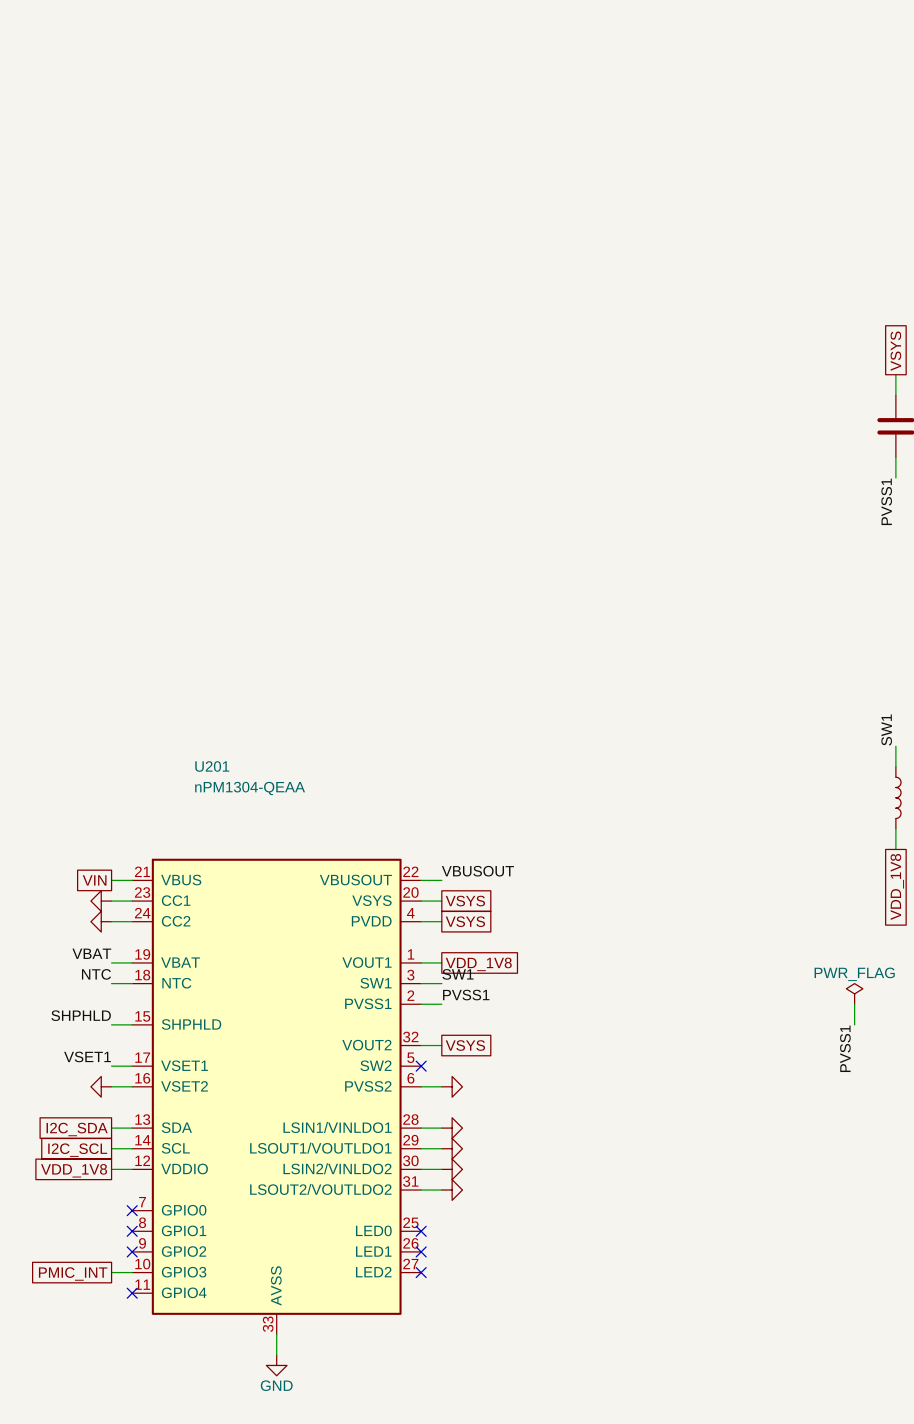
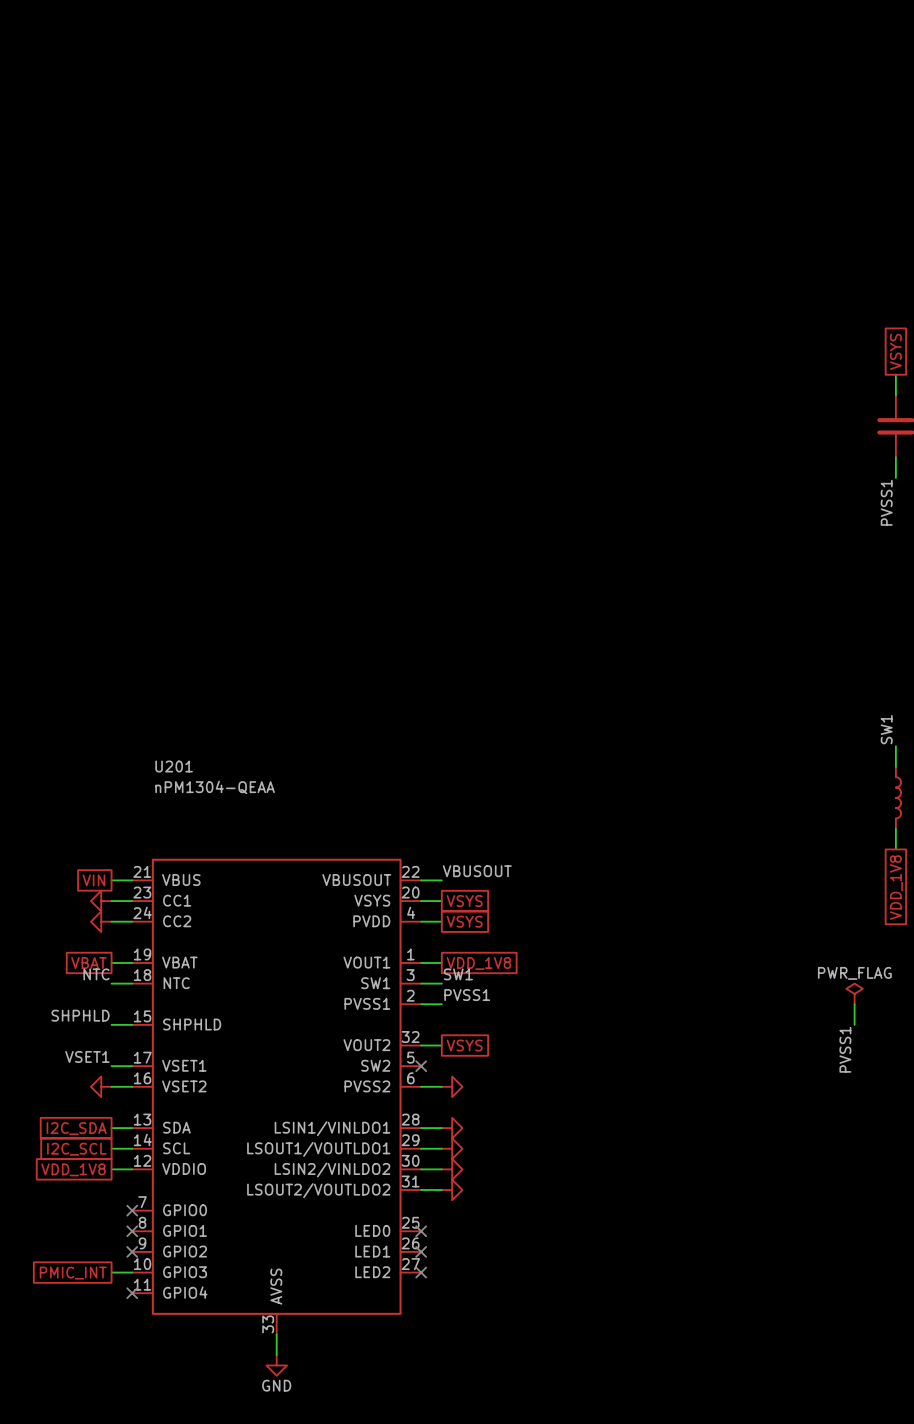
U201 name position: U201 (212, 766) -> U201 (174, 766)
U201 value position: nPM1304-QEAA (250, 788) -> nPM1304-QEAA (215, 787)
label: VBAT (91, 953) -> none
global label: none -> VBAT (88, 962)

